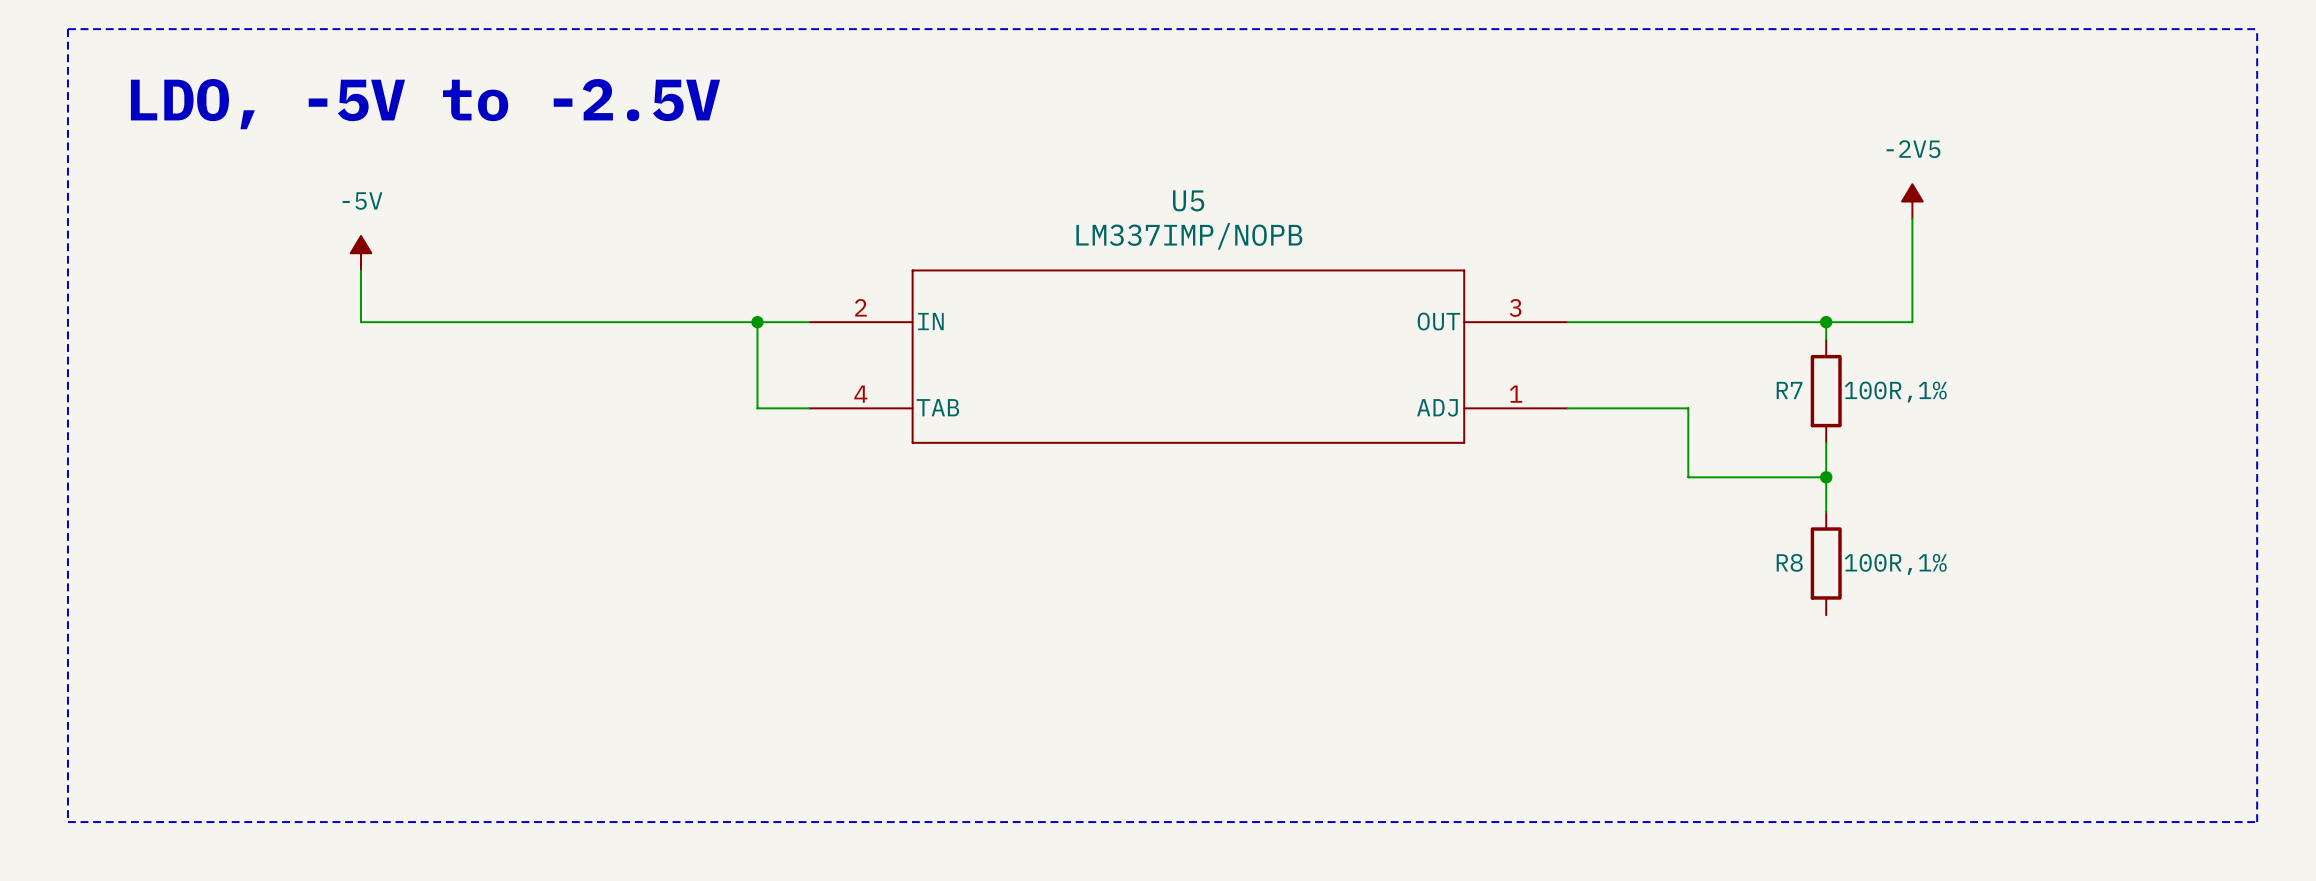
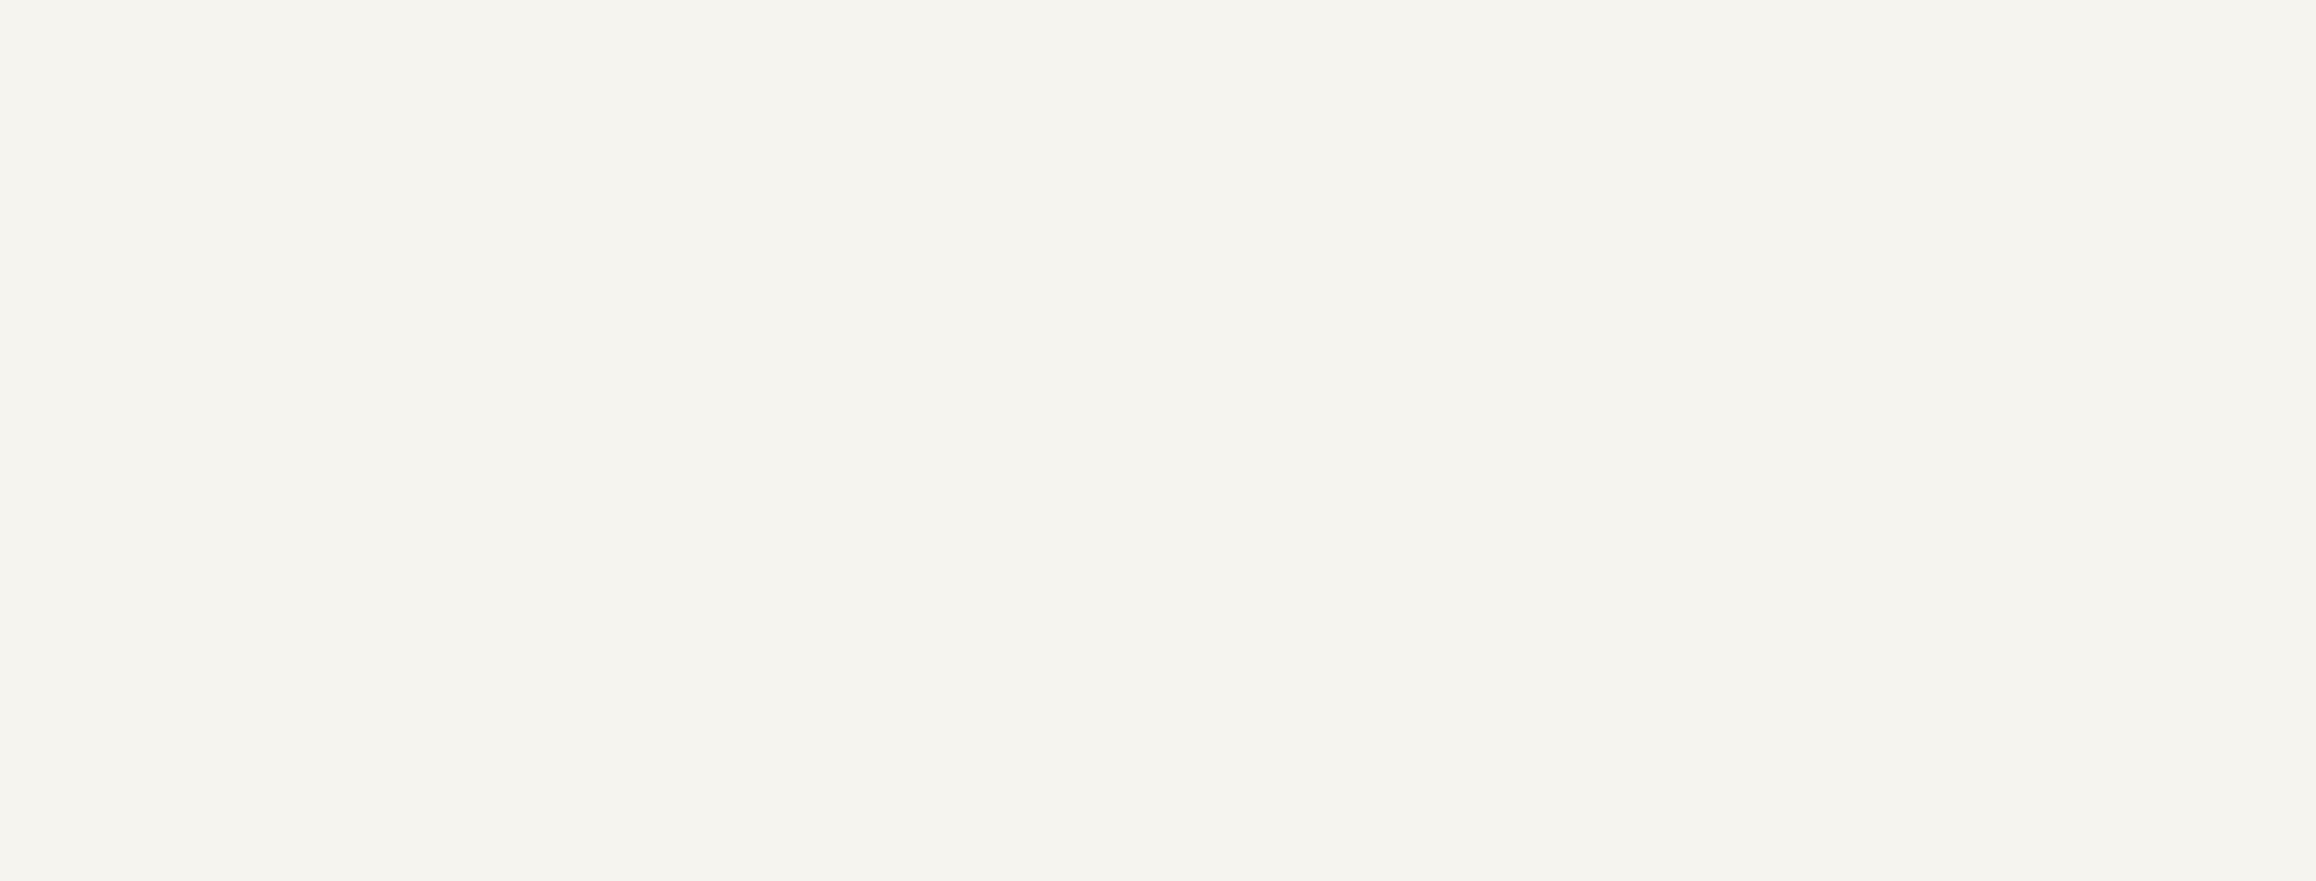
line: (67, 29) (67, 822) (2257, 822) (2257, 29) (67, 29) -> none
text: LDO, -5V to -2.5V (425, 104) -> none
power symbol: -2V5 (1912, 201) -> none
wire: (1912, 218) (1912, 322) (1567, 322) -> none
power symbol: -5V (361, 253) -> none
wire: (361, 270) (361, 322) (809, 322) -> none
wire: (757, 322) (757, 408) (809, 408) -> none
junction: (757, 322) -> none
wire: (1826, 322) (1826, 339) -> none
junction: (1826, 322) -> none
U5: LM337IMP/NOPB (1188, 356) -> none
R7: 100R,1% (1826, 391) -> none
wire: (1567, 408) (1688, 408) (1688, 477) (1826, 477) -> none
wire: (1826, 442) (1826, 511) -> none
junction: (1826, 477) -> none
R8: 100R,1% (1826, 563) -> none

